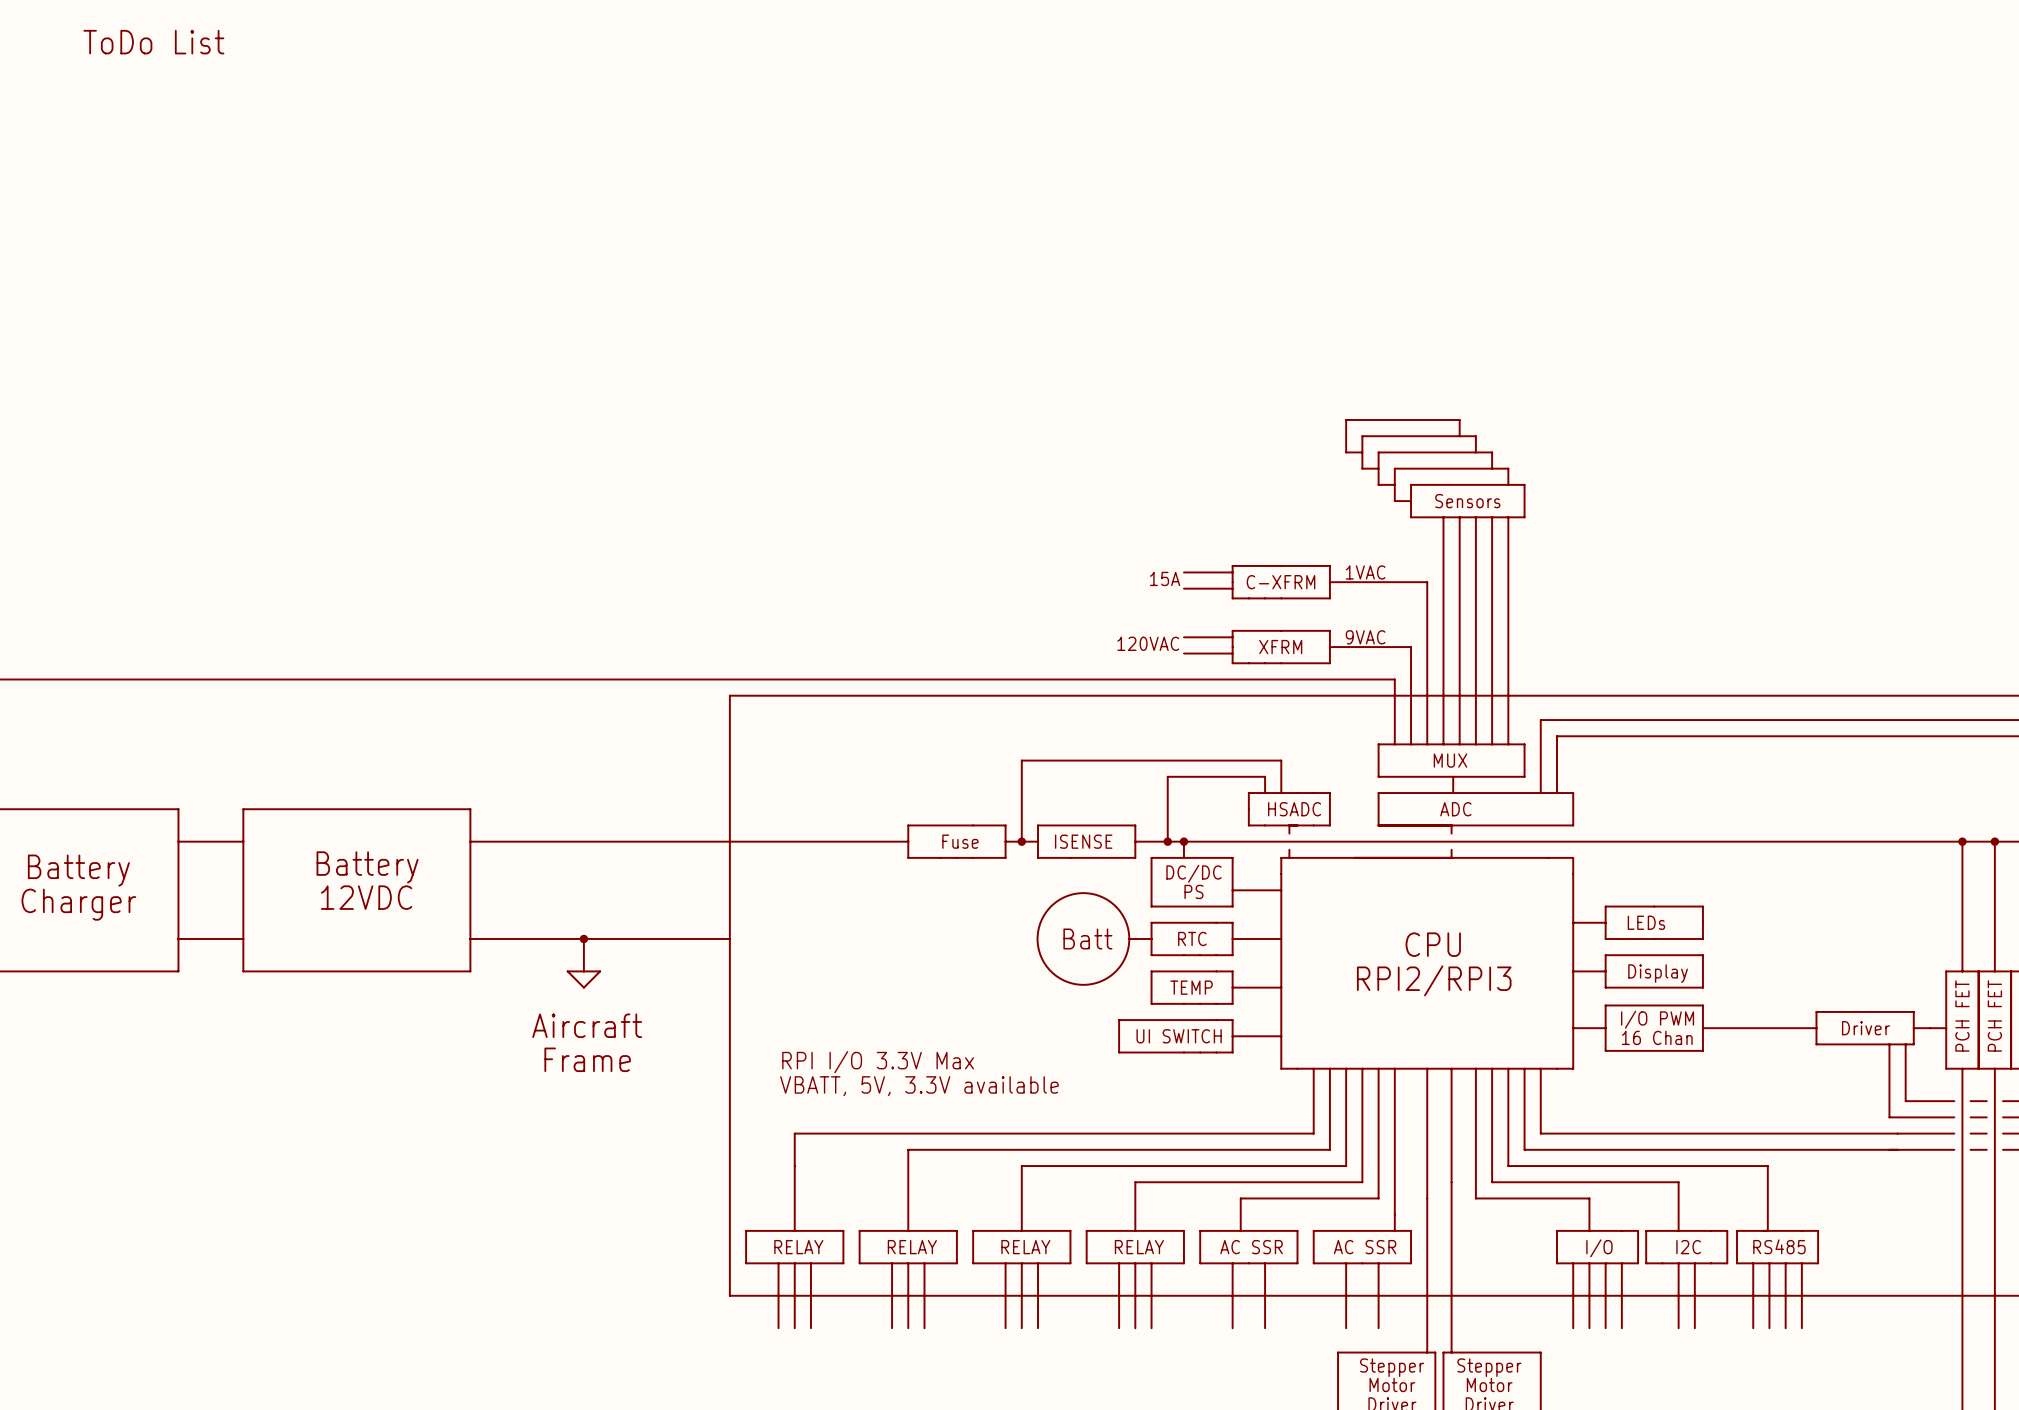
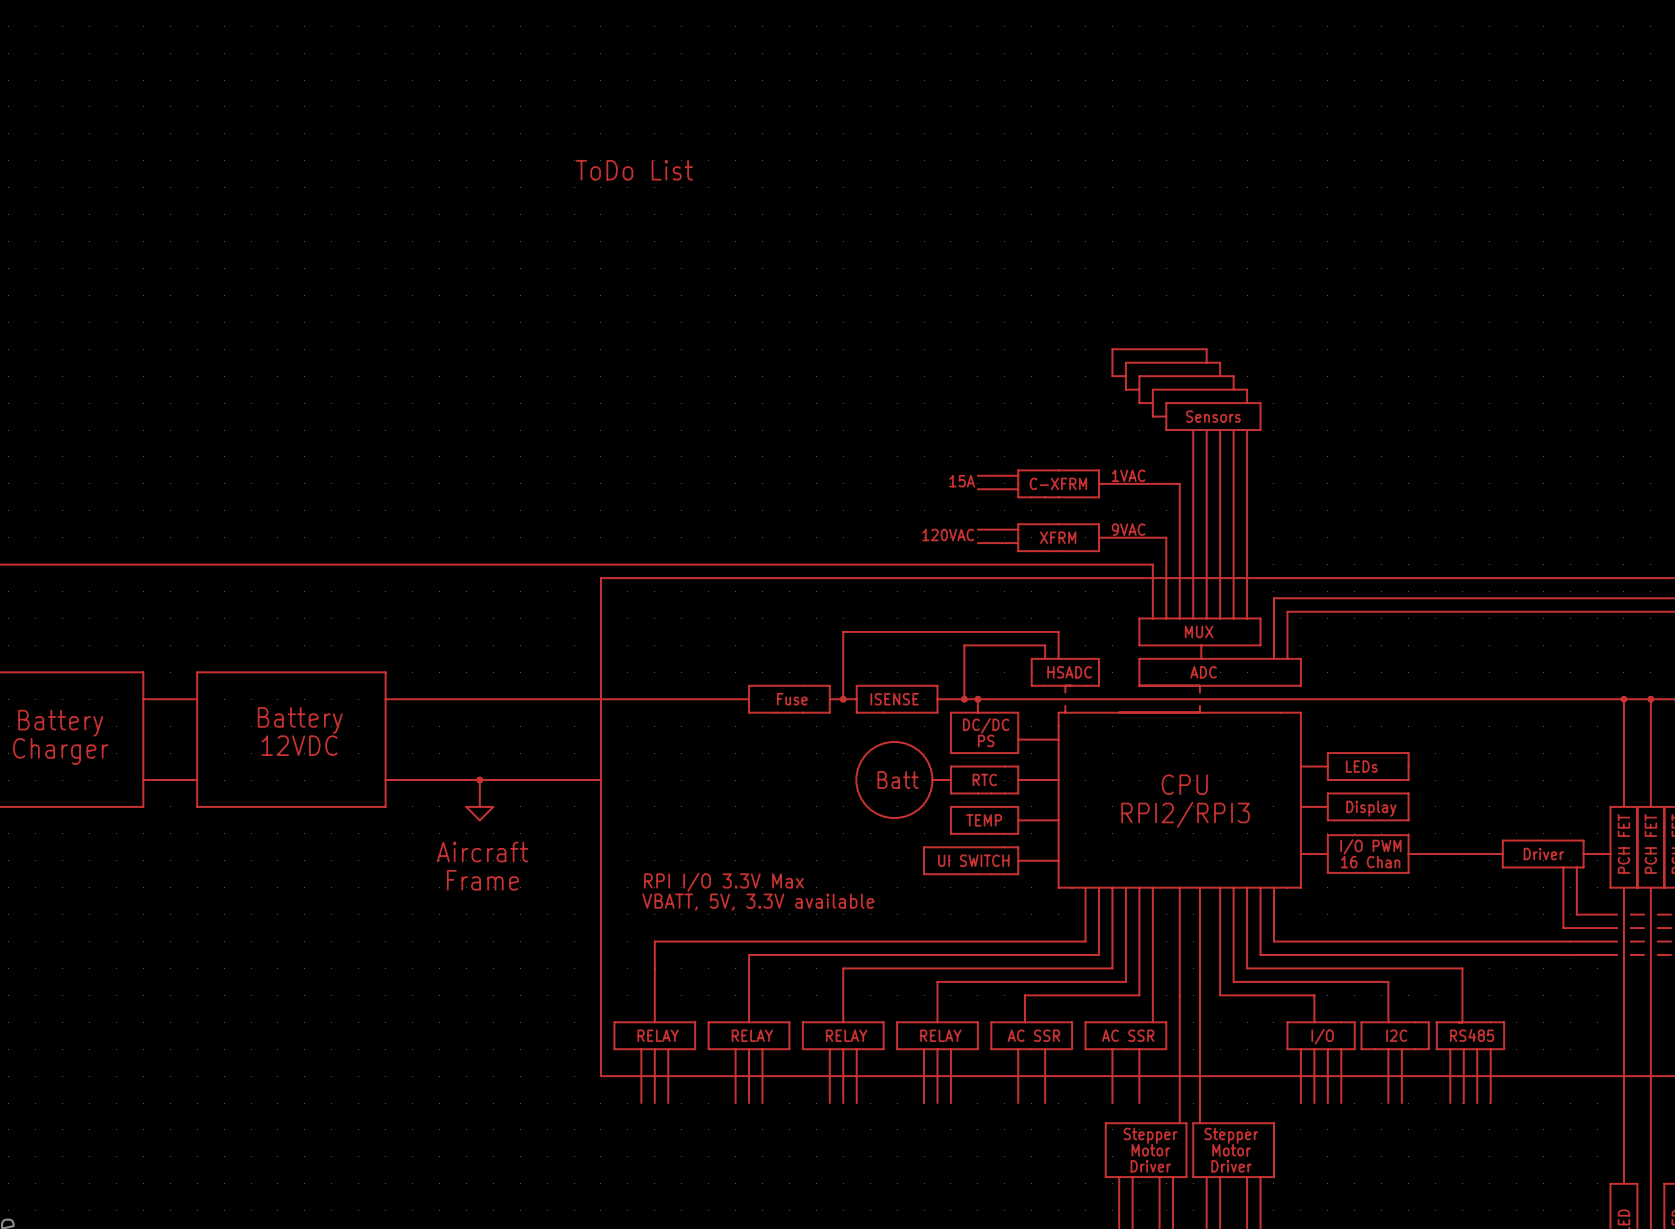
text: ToDo List (153, 42) -> none
text: none -> ToDo List (634, 170)

